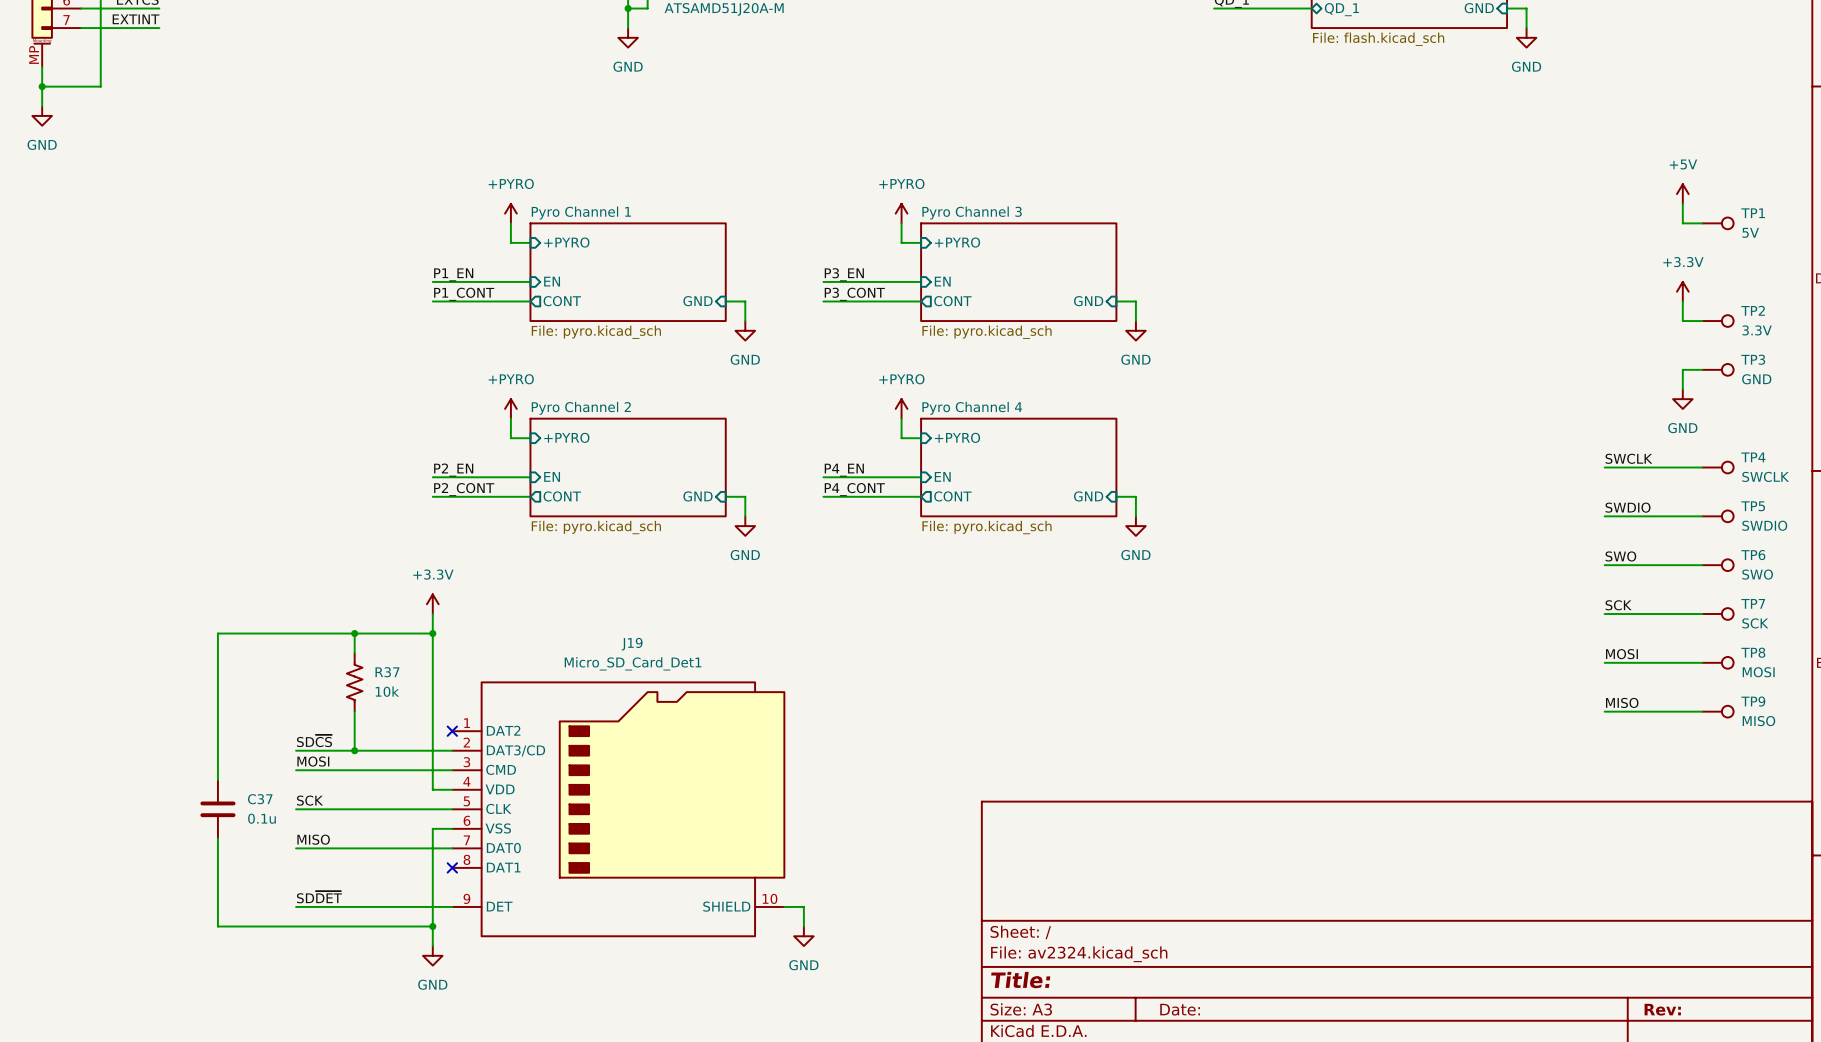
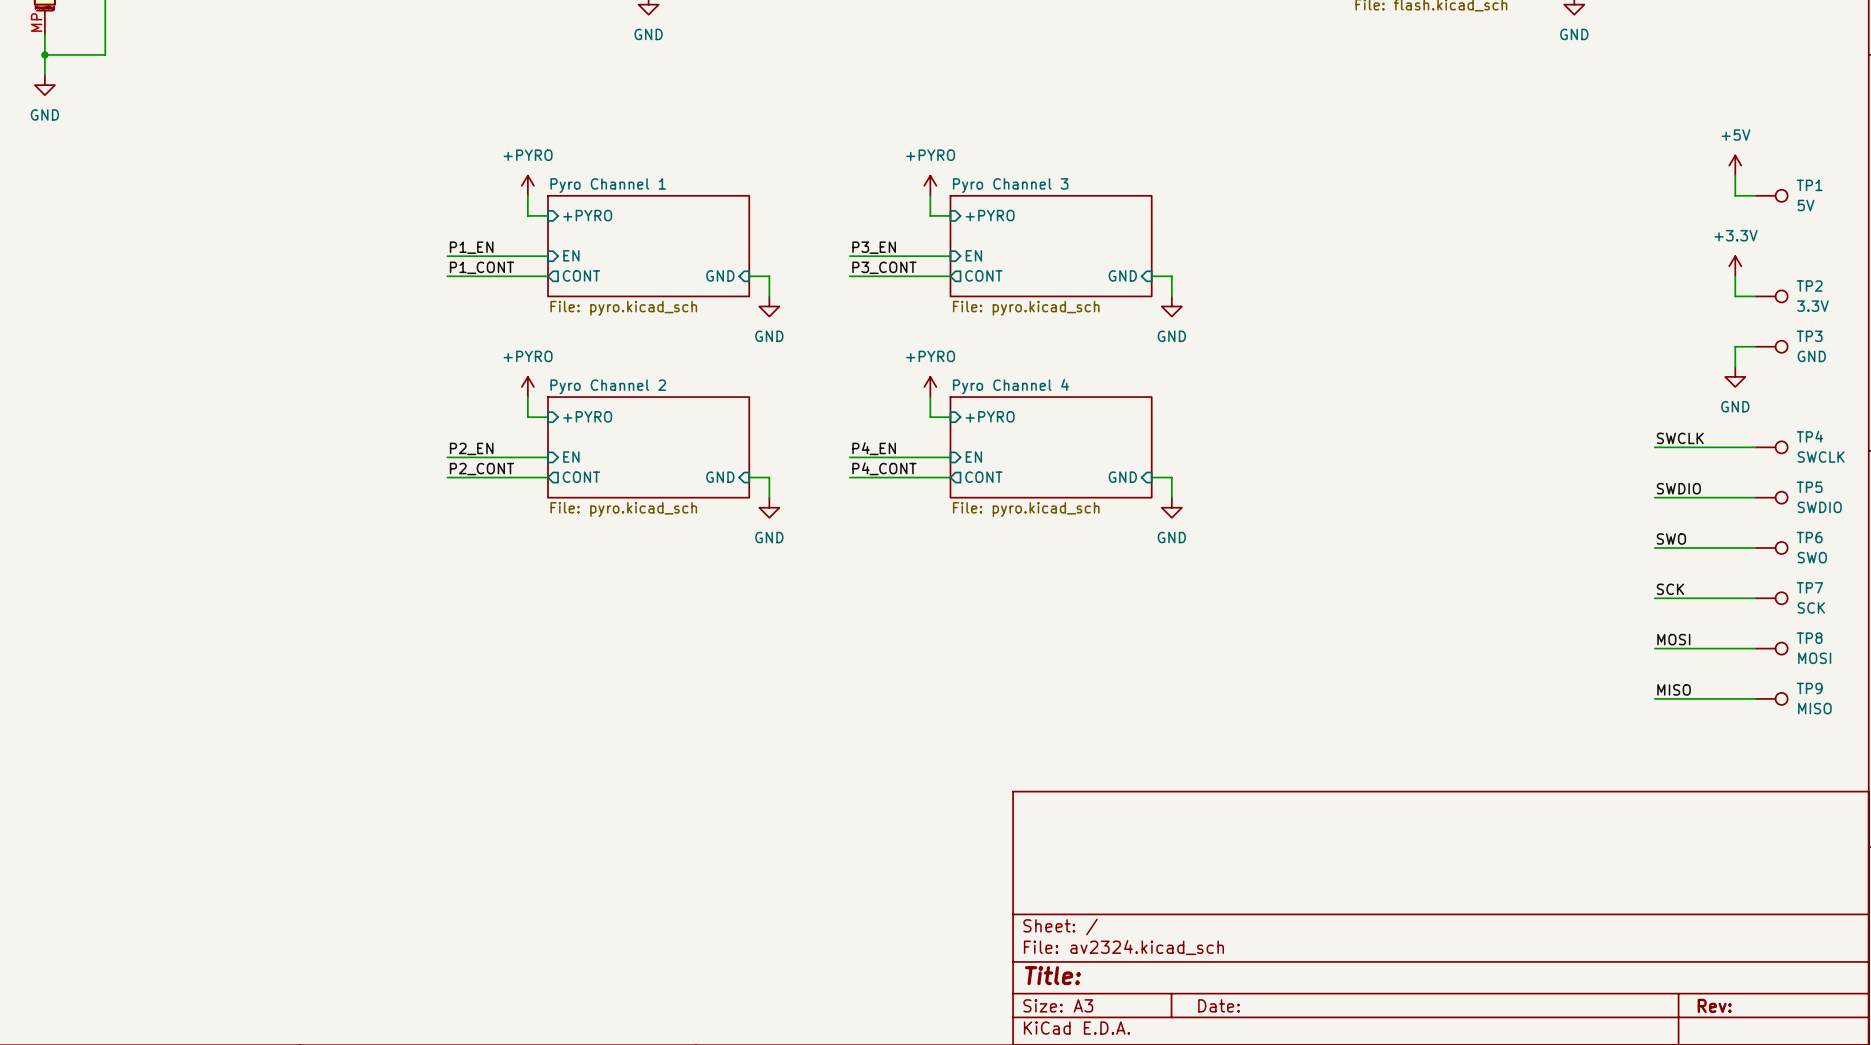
power symbol: +3.3V (432, 604) -> none
wire: (432, 614) (432, 789) (452, 789) -> none
wire: (354, 633) (354, 653) -> none
junction: (354, 633) -> none
wire: (432, 633) (217, 633) (217, 780) -> none
junction: (432, 633) -> none
R37: 10k (354, 682) -> none
wire: (354, 711) (354, 750) -> none
no-connect mark: (452, 731) -> none
label: SD~{CS} (314, 740) -> none
wire: (296, 750) (452, 750) -> none
junction: (354, 750) -> none
label: MOSI (313, 761) -> none
wire: (296, 770) (452, 770) -> none
label: SCK (309, 800) -> none
C37: 0.1u (217, 809) -> none
wire: (296, 809) (452, 809) -> none
J19: Micro_SD_Card_Det1 (618, 809) -> none
wire: (452, 828) (432, 828) (432, 946) -> none
wire: (217, 838) (217, 926) (432, 926) -> none
label: MISO (313, 839) -> none
wire: (296, 848) (452, 848) -> none
no-connect mark: (452, 867) -> none
label: SD~{DET} (319, 897) -> none
wire: (296, 906) (452, 906) -> none
wire: (784, 906) (803, 906) (803, 926) -> none
junction: (432, 926) -> none
power symbol: GND (803, 936) -> none
power symbol: GND (432, 955) -> none

